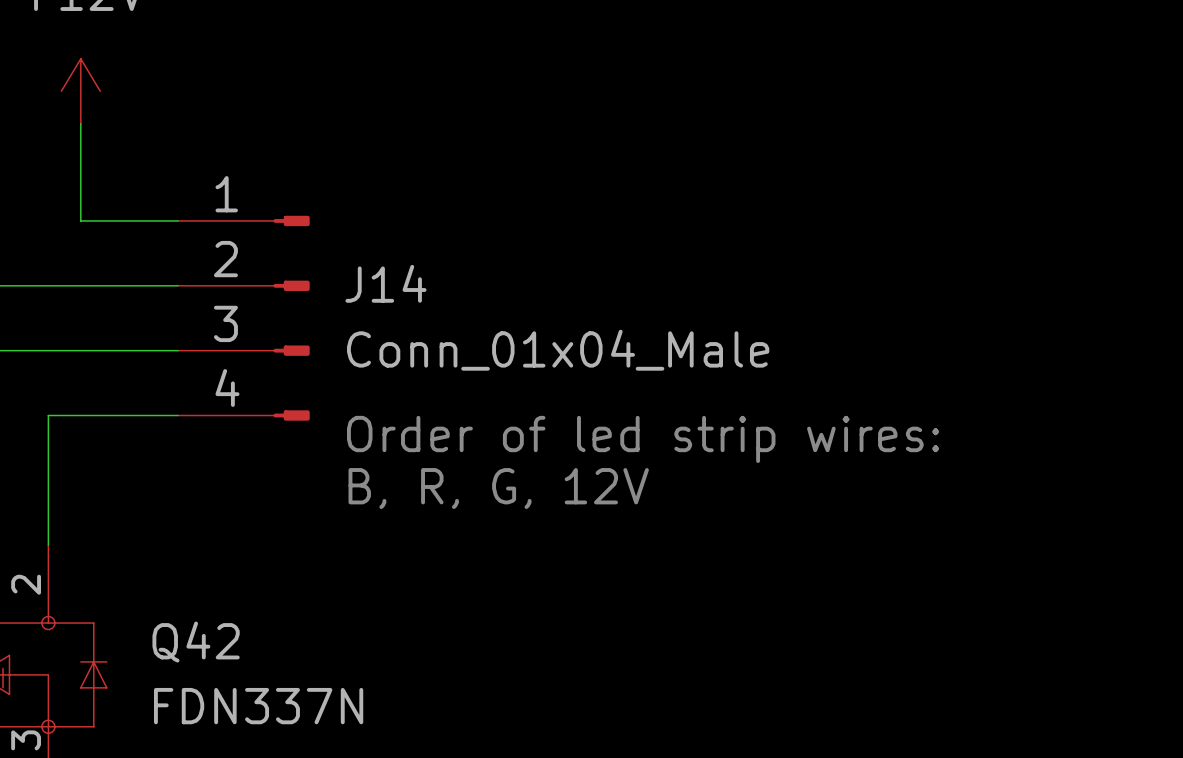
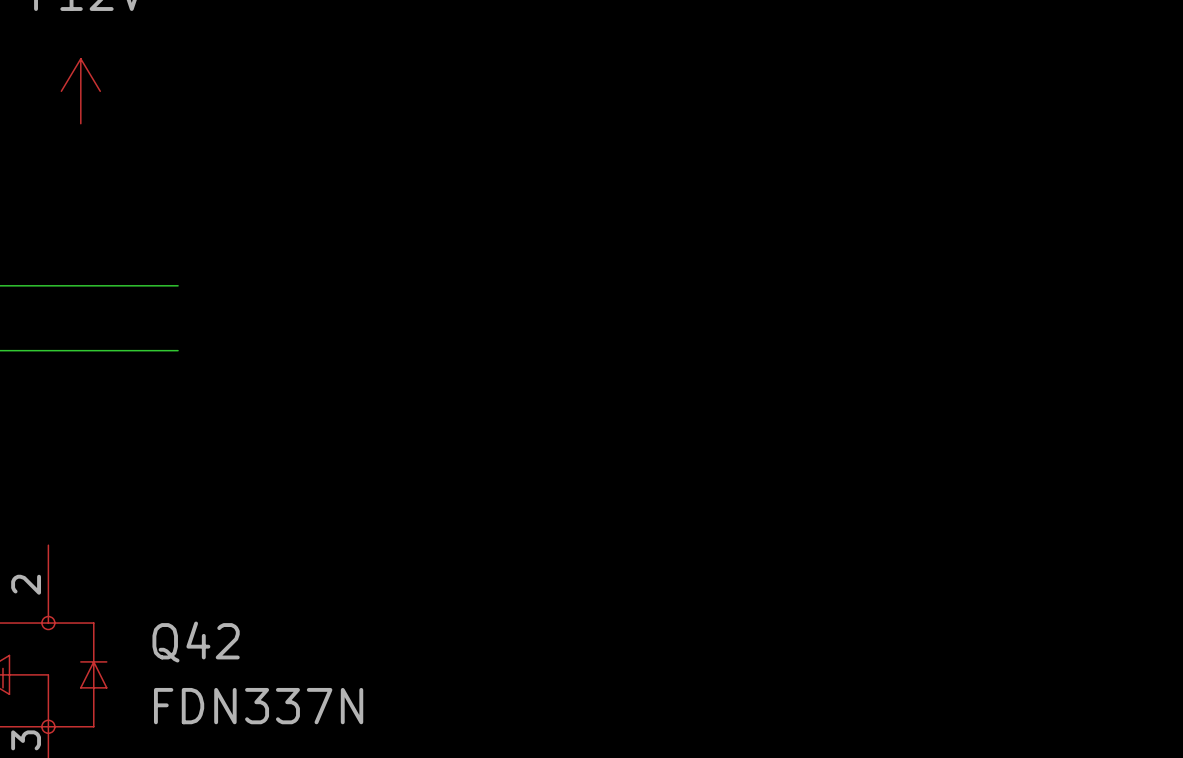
wire: (80, 123) (80, 220) (178, 220) -> none
J14: Conn_01x04_Male (243, 318) -> none
wire: (178, 415) (48, 415) (48, 545) -> none
text: Order of led strip wires: (643, 439) -> none
text: B, R, G, 12V (498, 488) -> none

